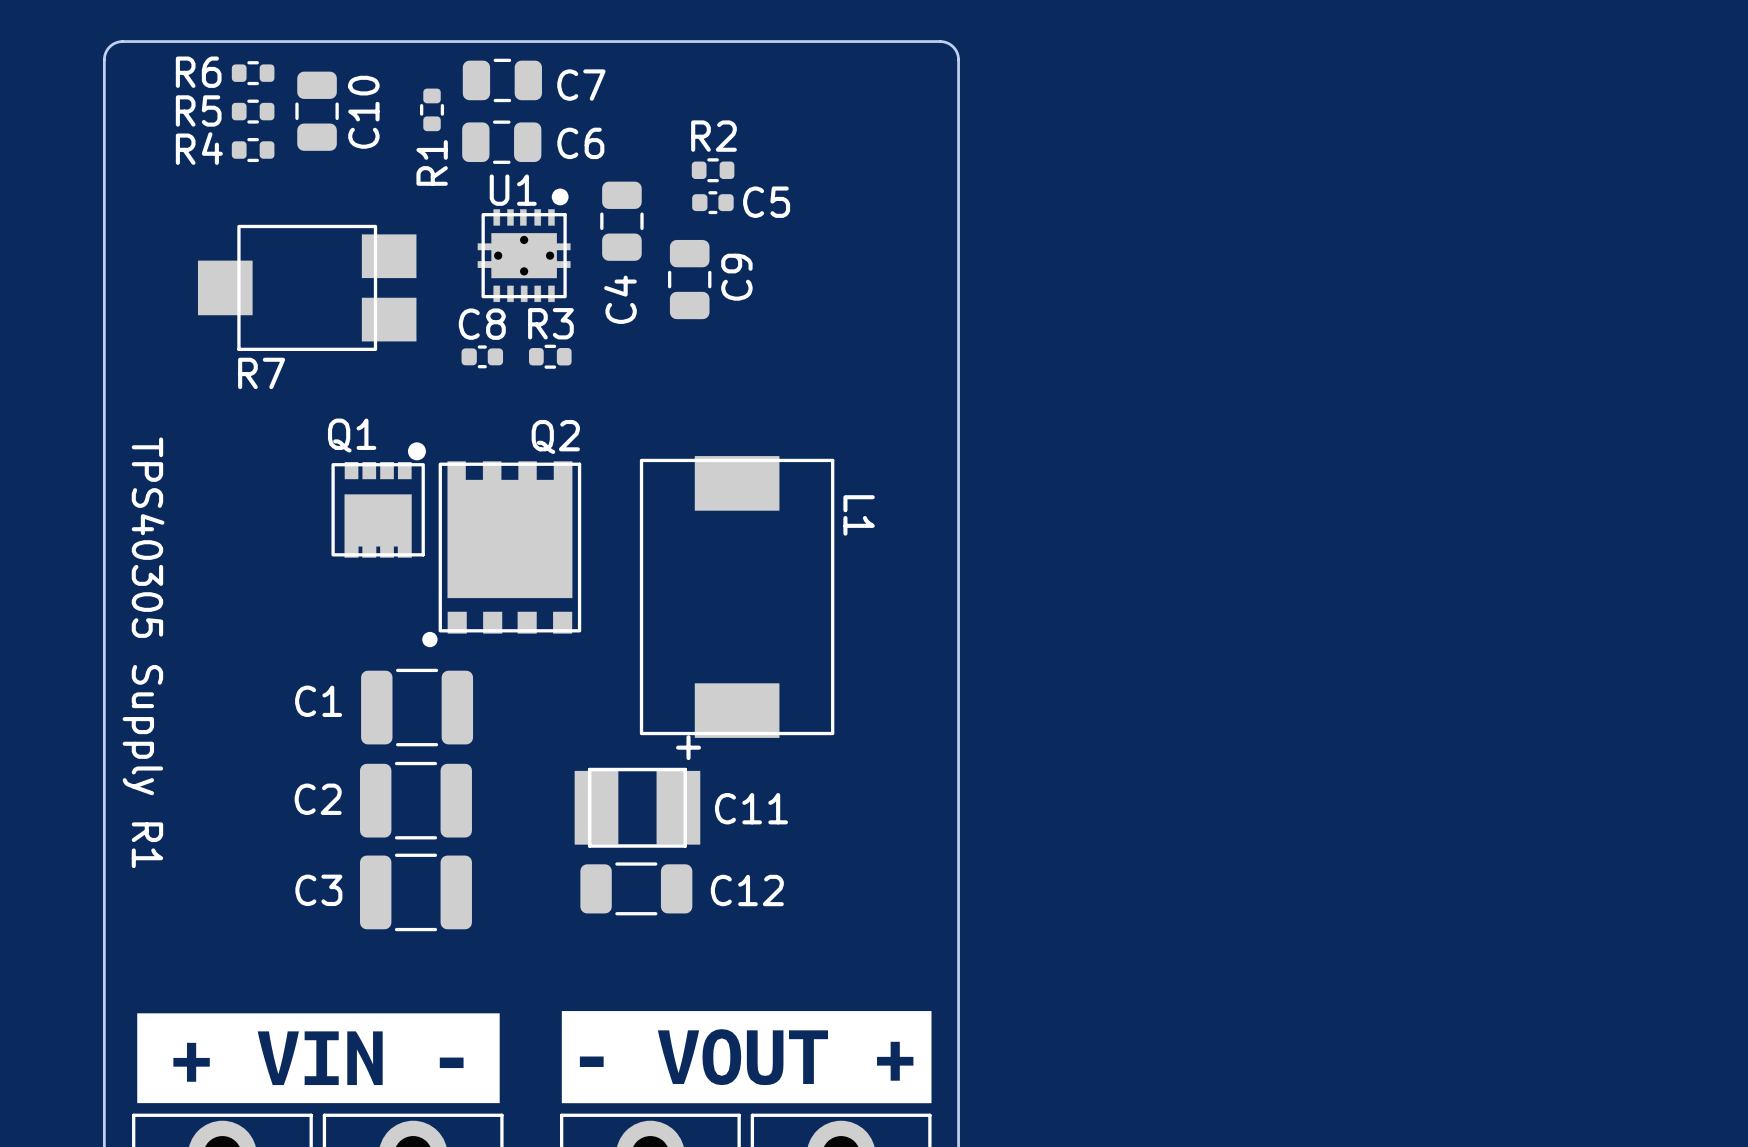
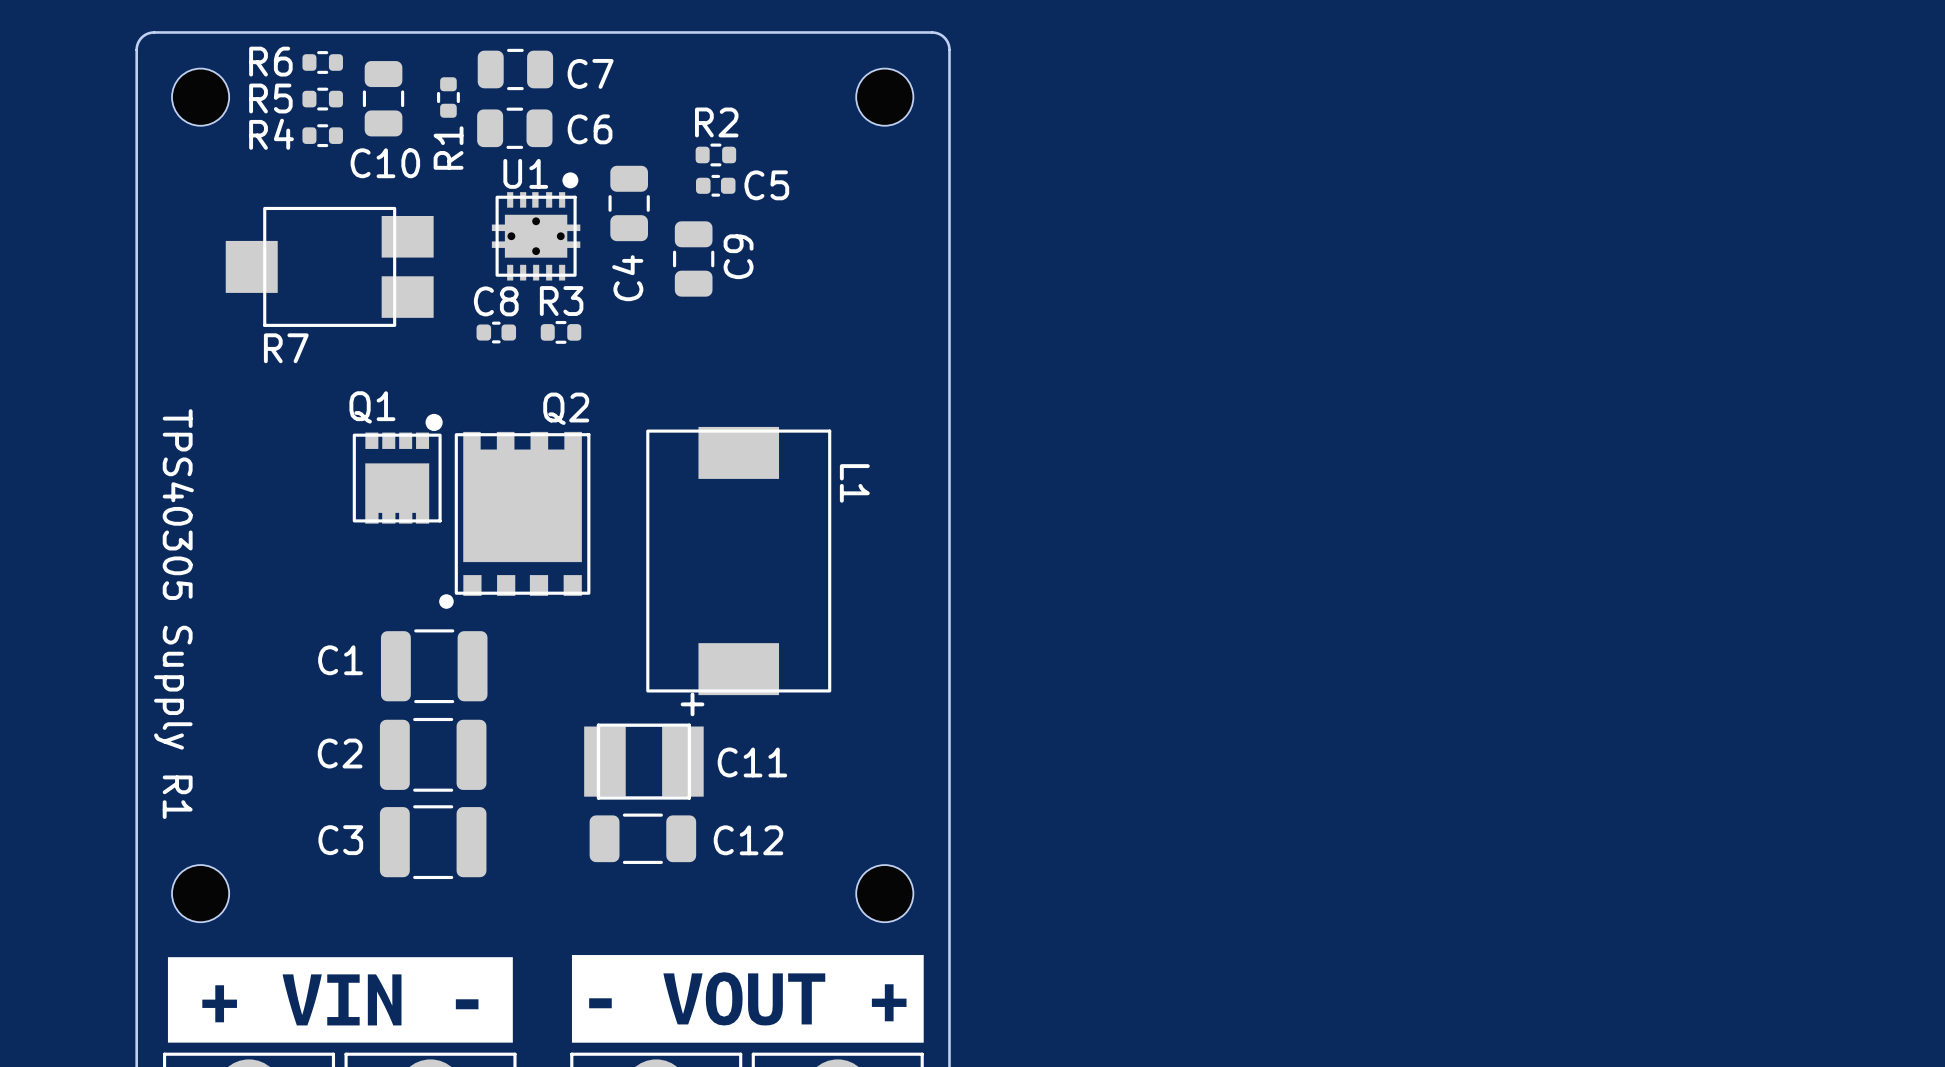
R6 position: (253, 73) -> (322, 62)
part: none -> (200, 97)
part: none -> (884, 97)
R5 position: (253, 111) -> (322, 99)
C10 position: (317, 111) -> (383, 98)
C10 name rotation: 0° (363, 112) -> 90° clockwise (385, 163)
R4 position: (253, 150) -> (322, 135)
part: none -> (200, 893)
part: none -> (884, 893)

